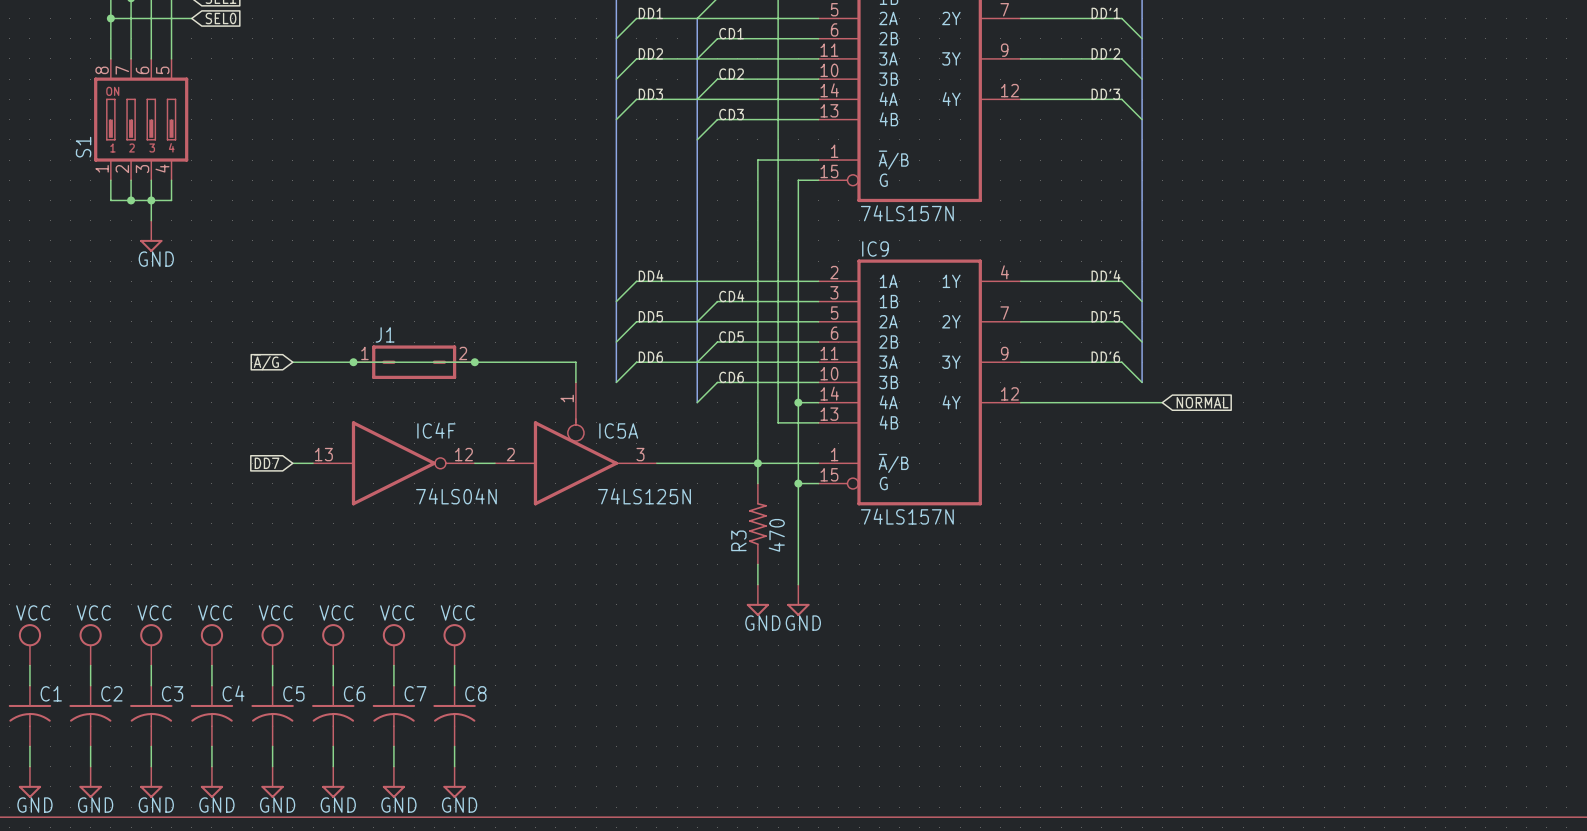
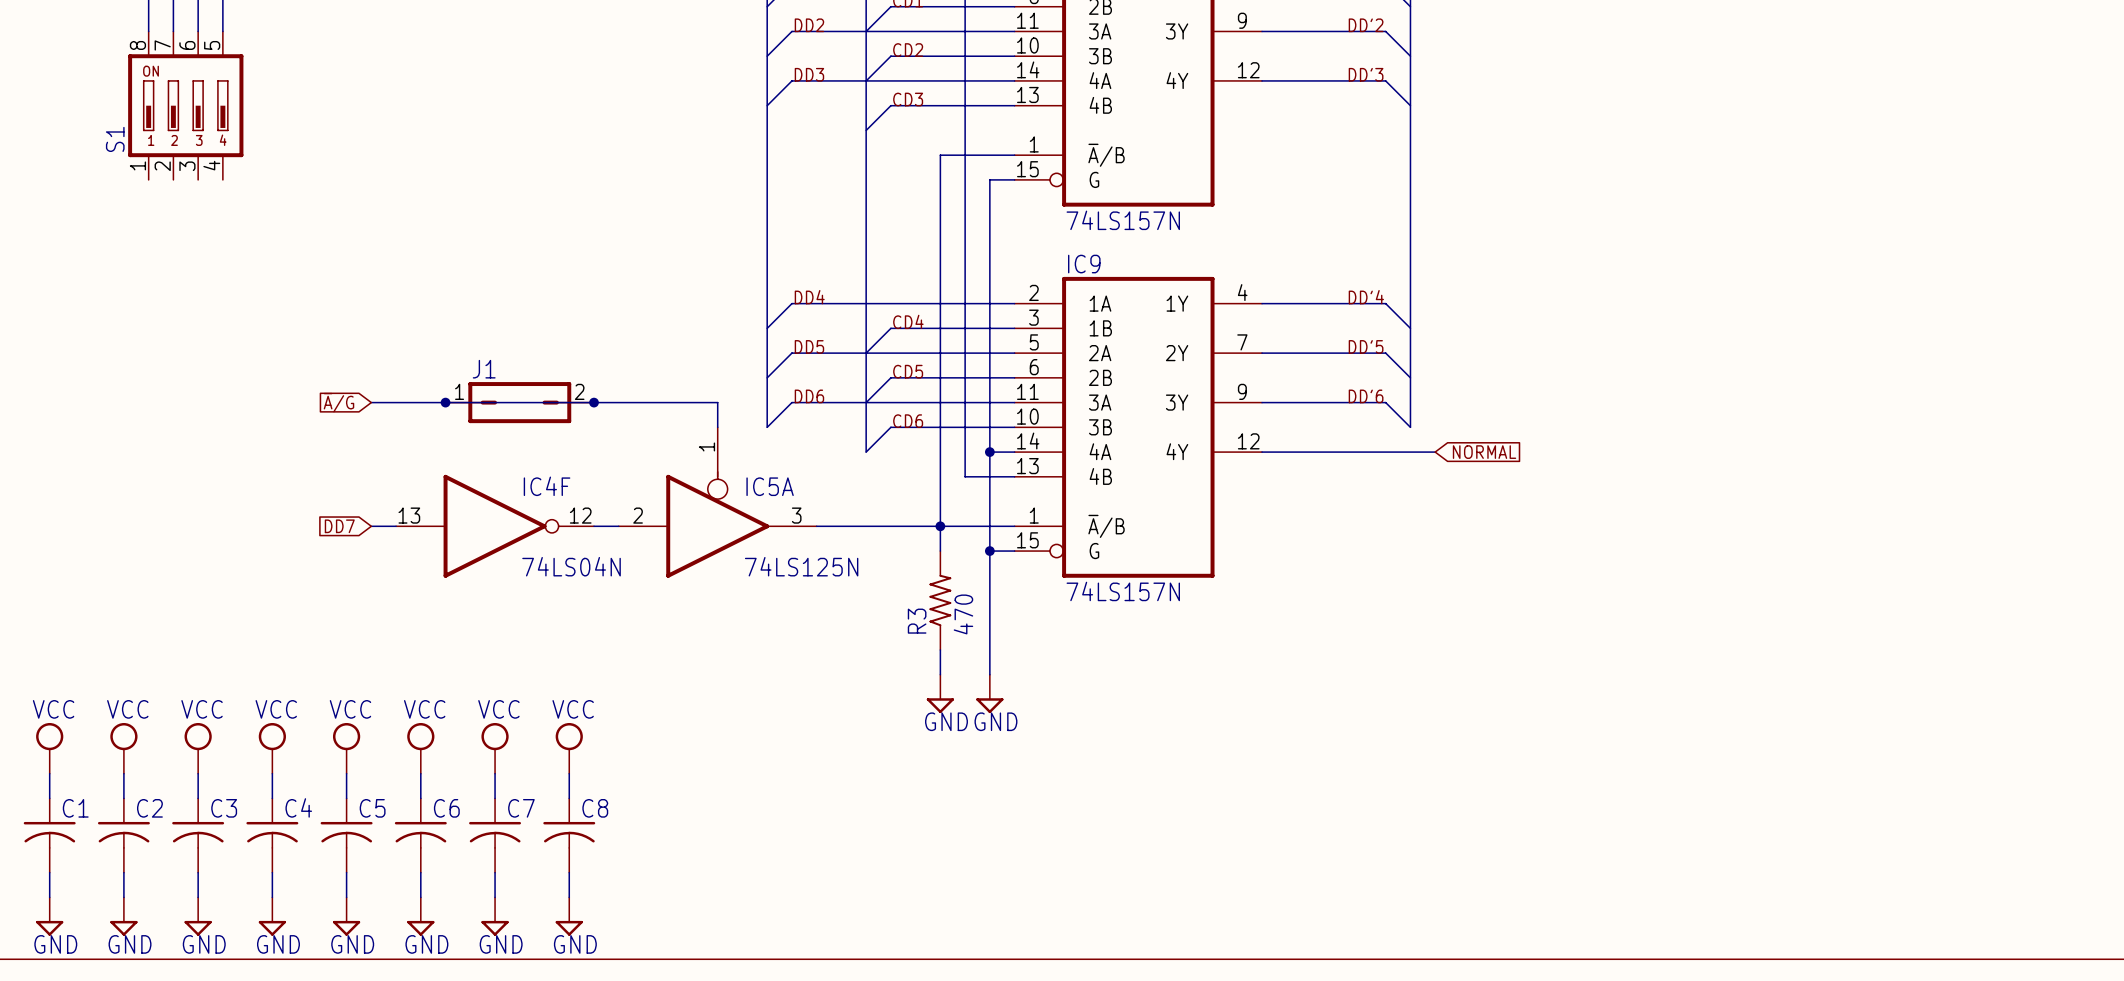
wire: (110, 180) (110, 200) (171, 200) (171, 180) -> none
wire: (131, 180) (131, 200) -> none
wire: (151, 180) (151, 220) -> none
junction: (131, 200) -> none
junction: (151, 200) -> none
power symbol: GND (151, 236) -> none

